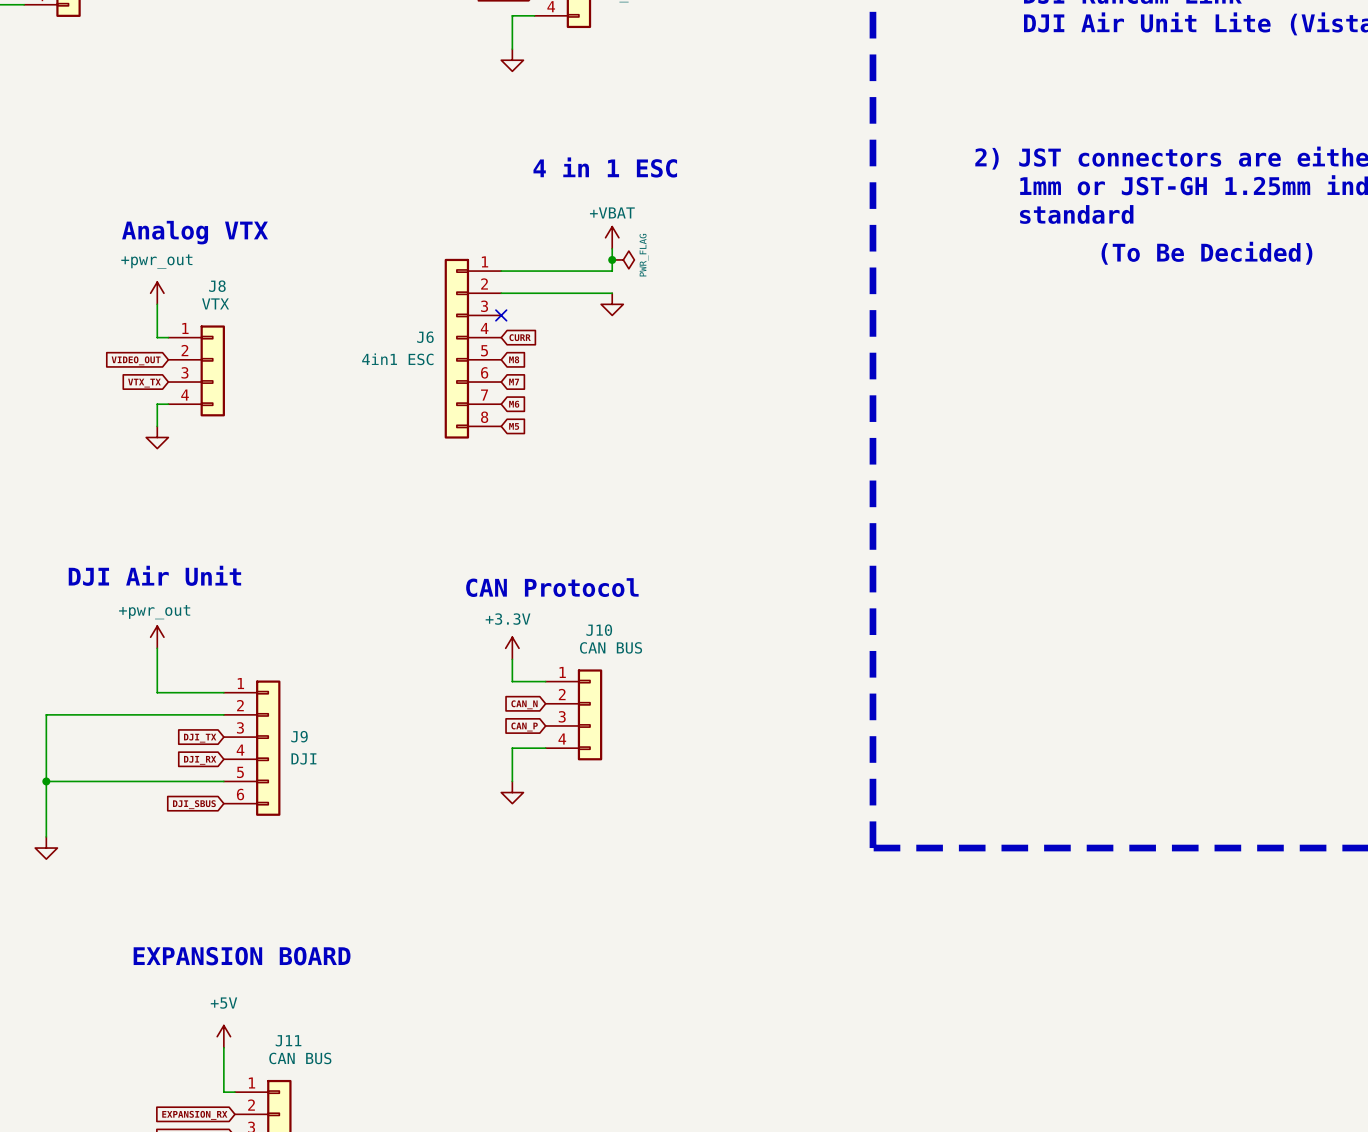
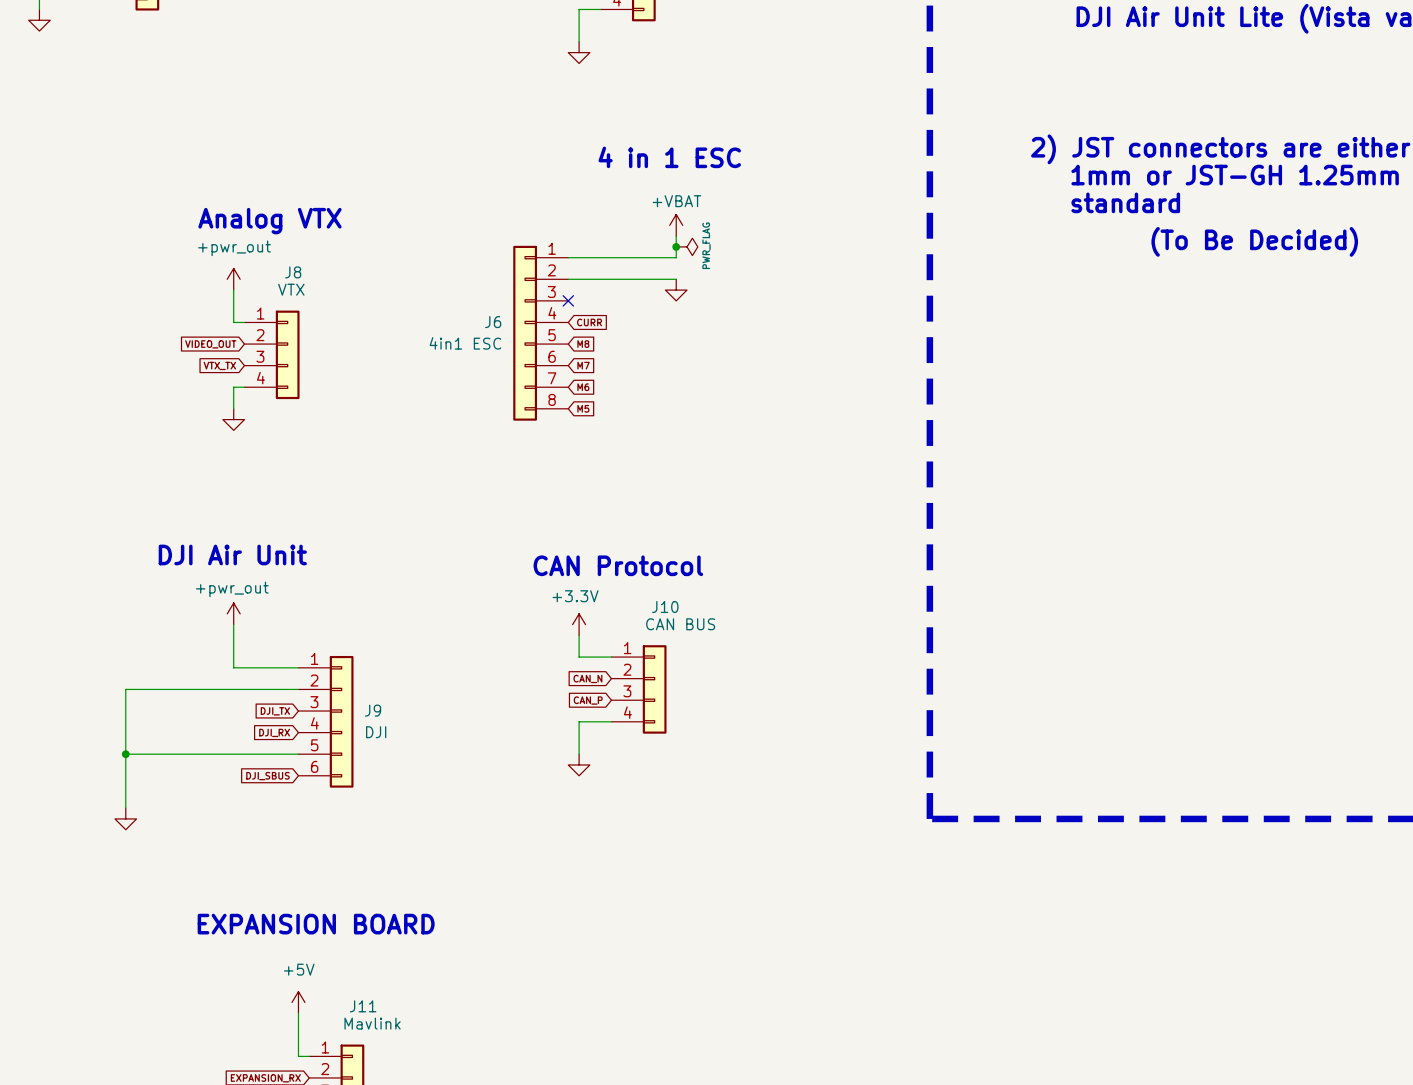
J11 value: CAN BUS (300, 1058) -> Mavlink (372, 1023)

